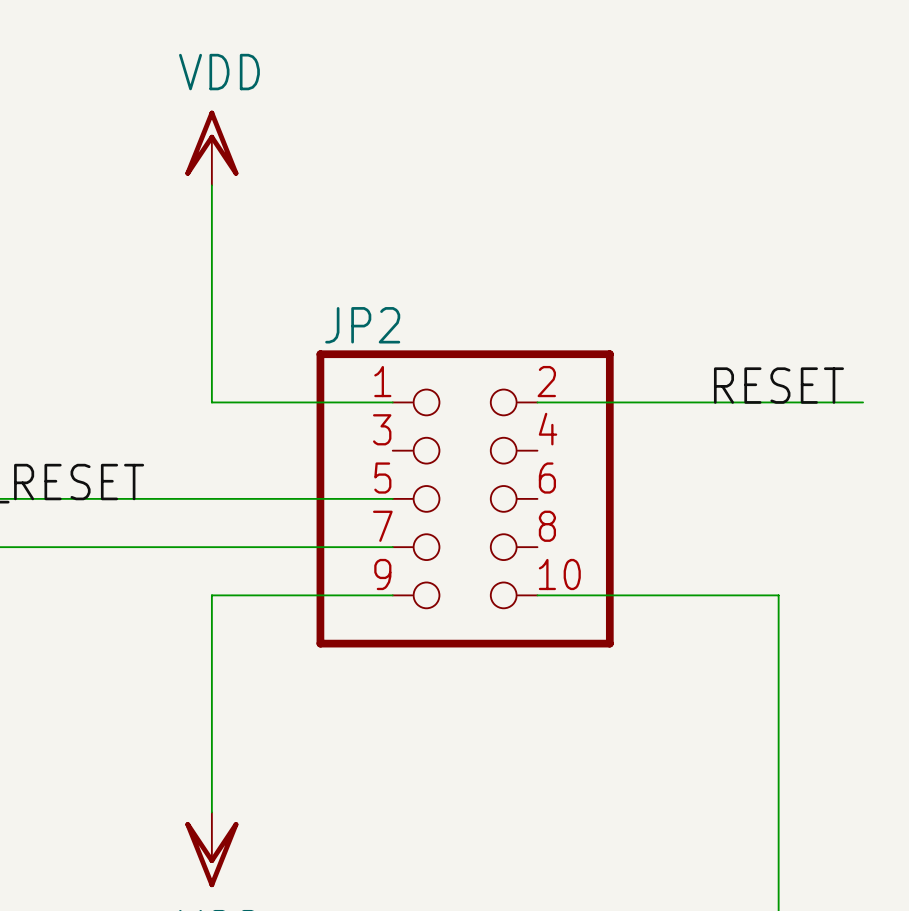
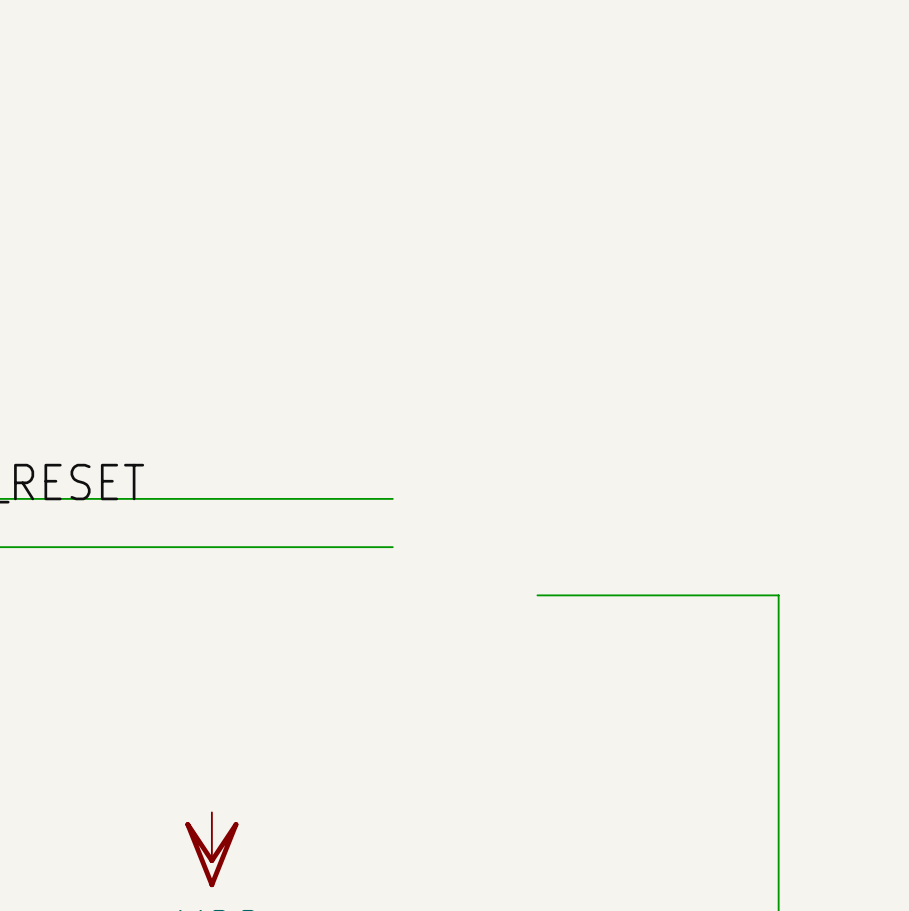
power symbol: VDD (211, 148) -> none
wire: (211, 185) (211, 402) (392, 402) -> none
label: RESET (778, 385) -> none
wire: (537, 402) (863, 402) -> none
JP2: (465, 498) -> none
wire: (392, 595) (211, 595) (211, 812) -> none

